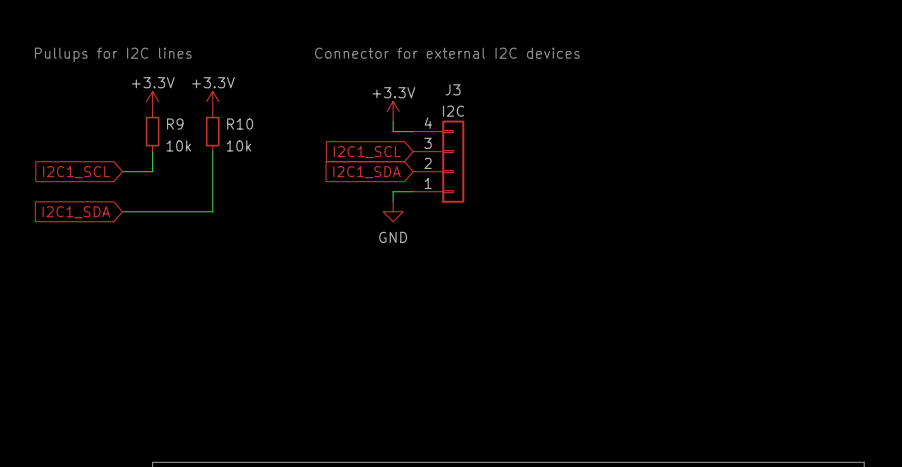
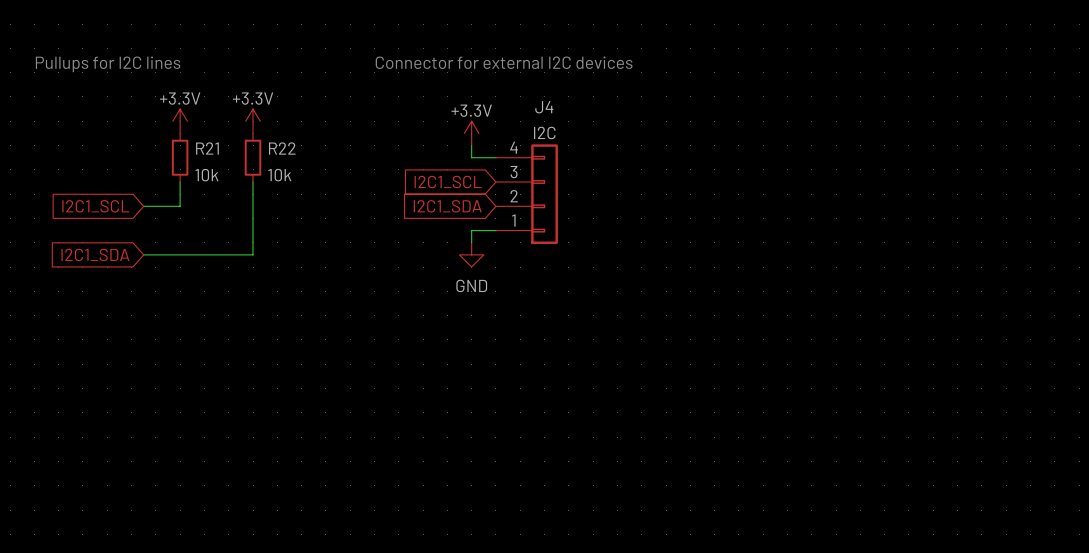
J3 name: J3 (453, 89) -> J4 (544, 107)
R9 name: R9 (175, 124) -> R21 (207, 148)
R10 name: R10 (240, 124) -> R22 (282, 148)

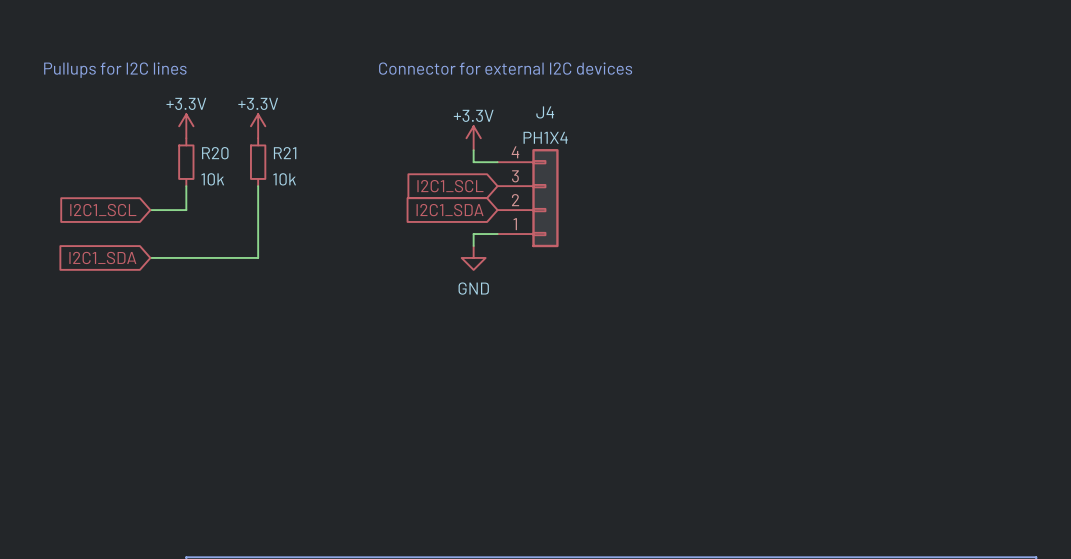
J4 value: I2C (544, 132) -> PH1X4 (545, 137)
R21 name: R21 (207, 148) -> R20 (215, 153)
R22 name: R22 (282, 148) -> R21 (285, 153)

